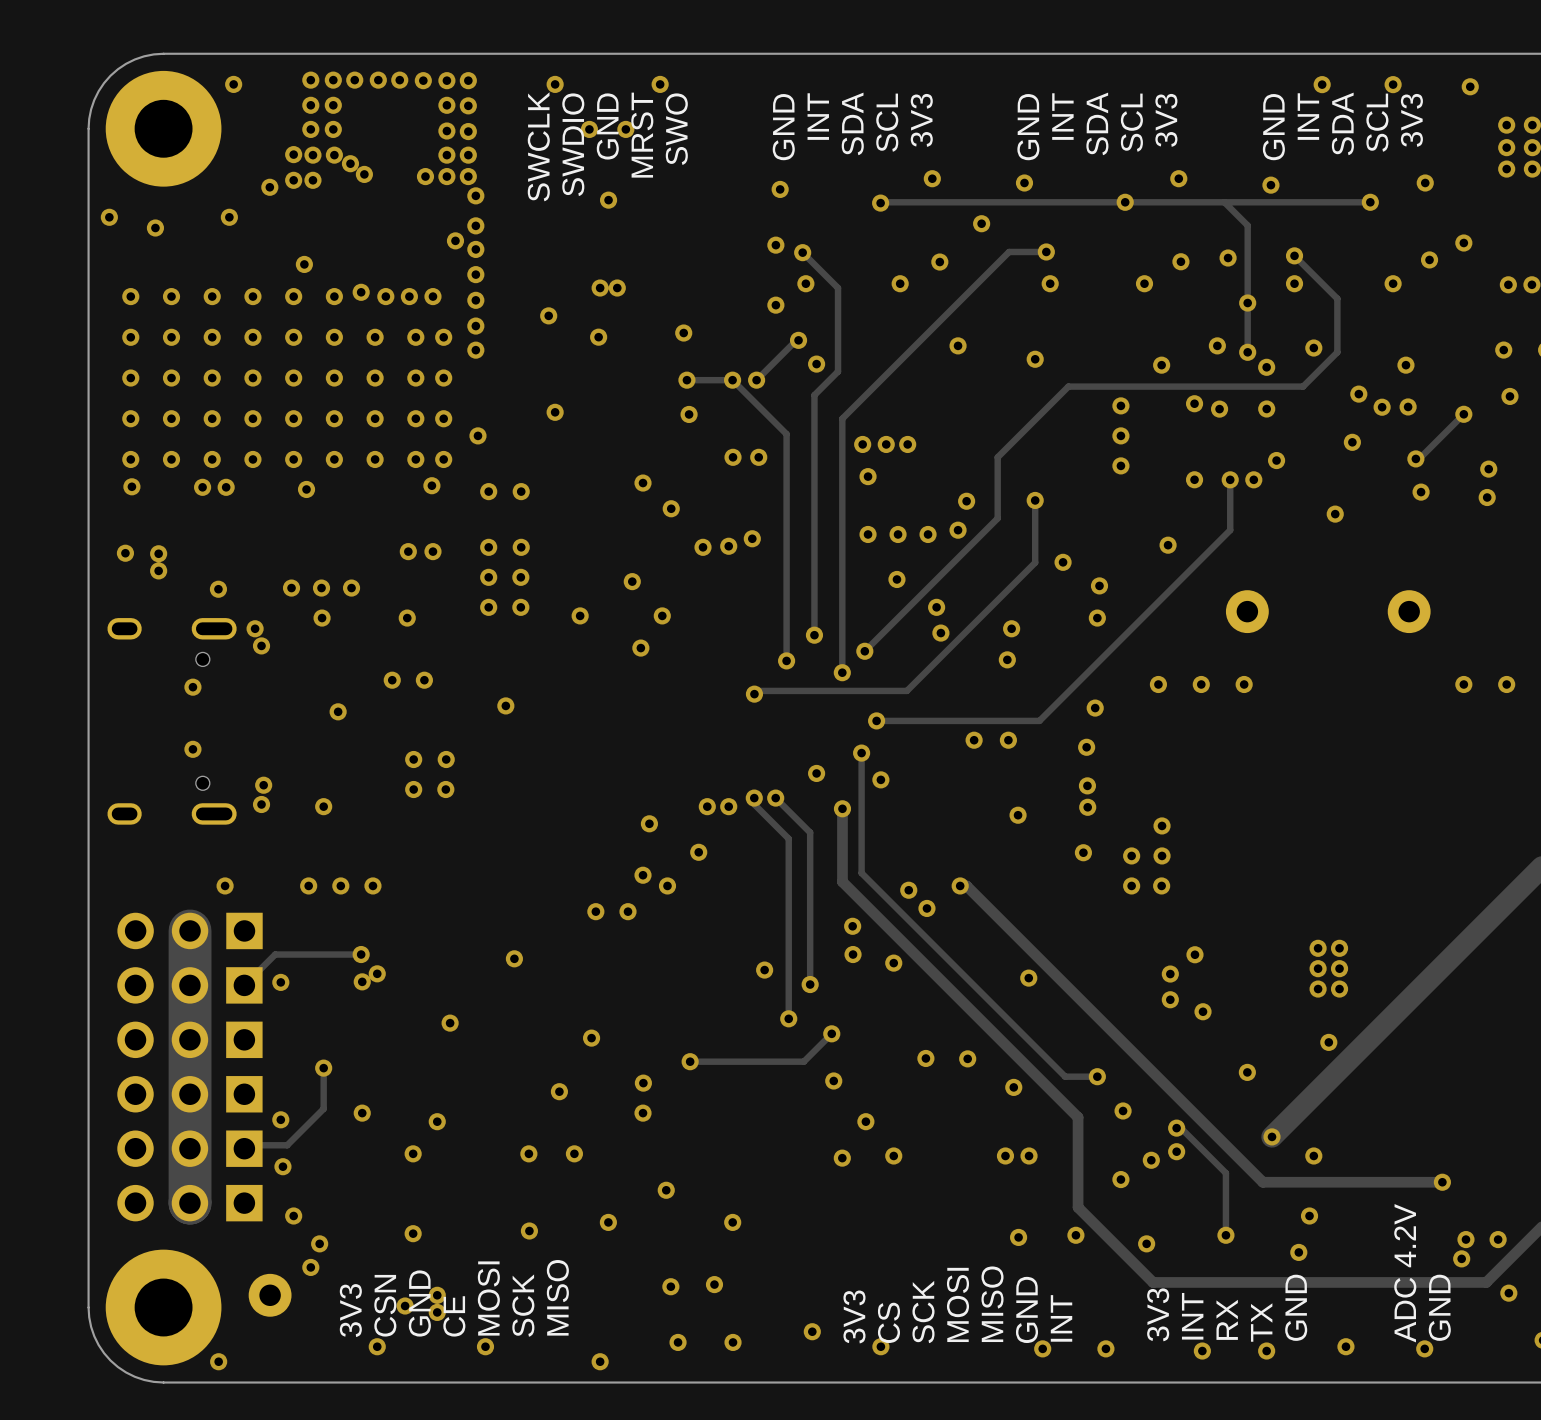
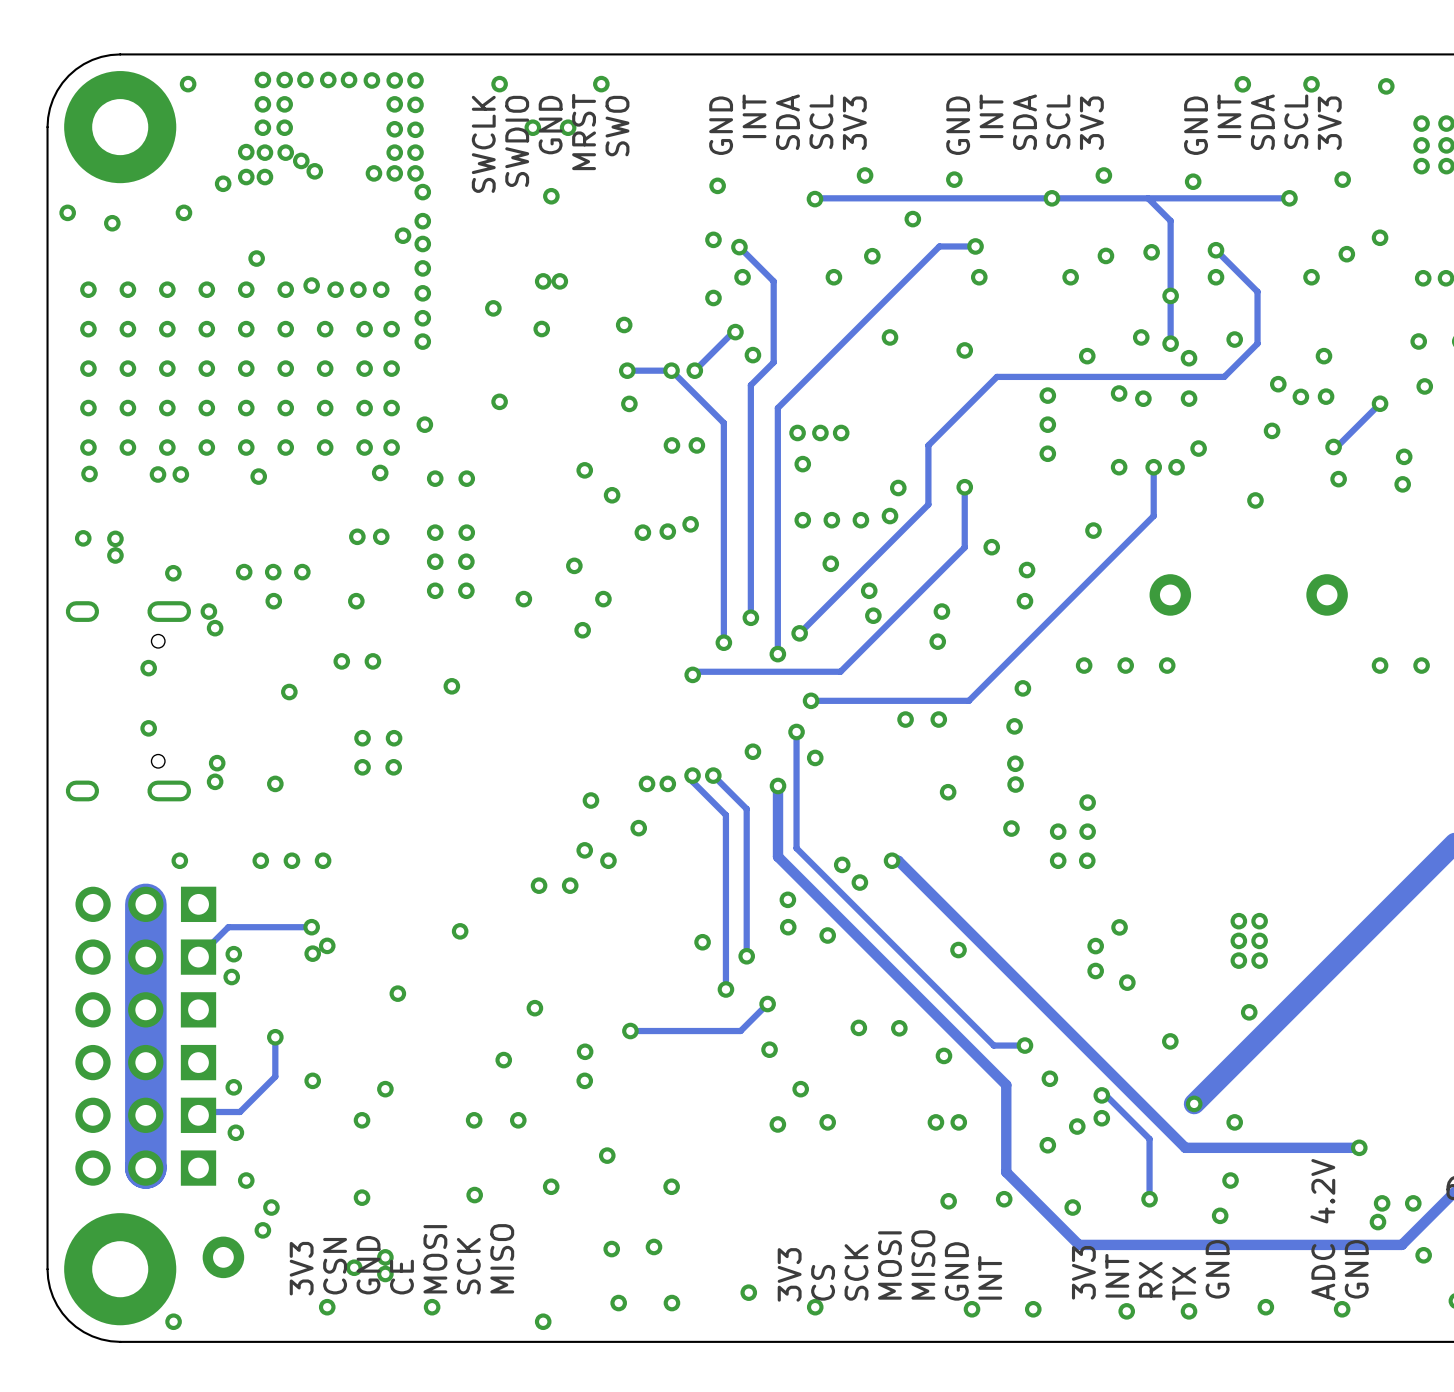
via: none -> (231, 977)

